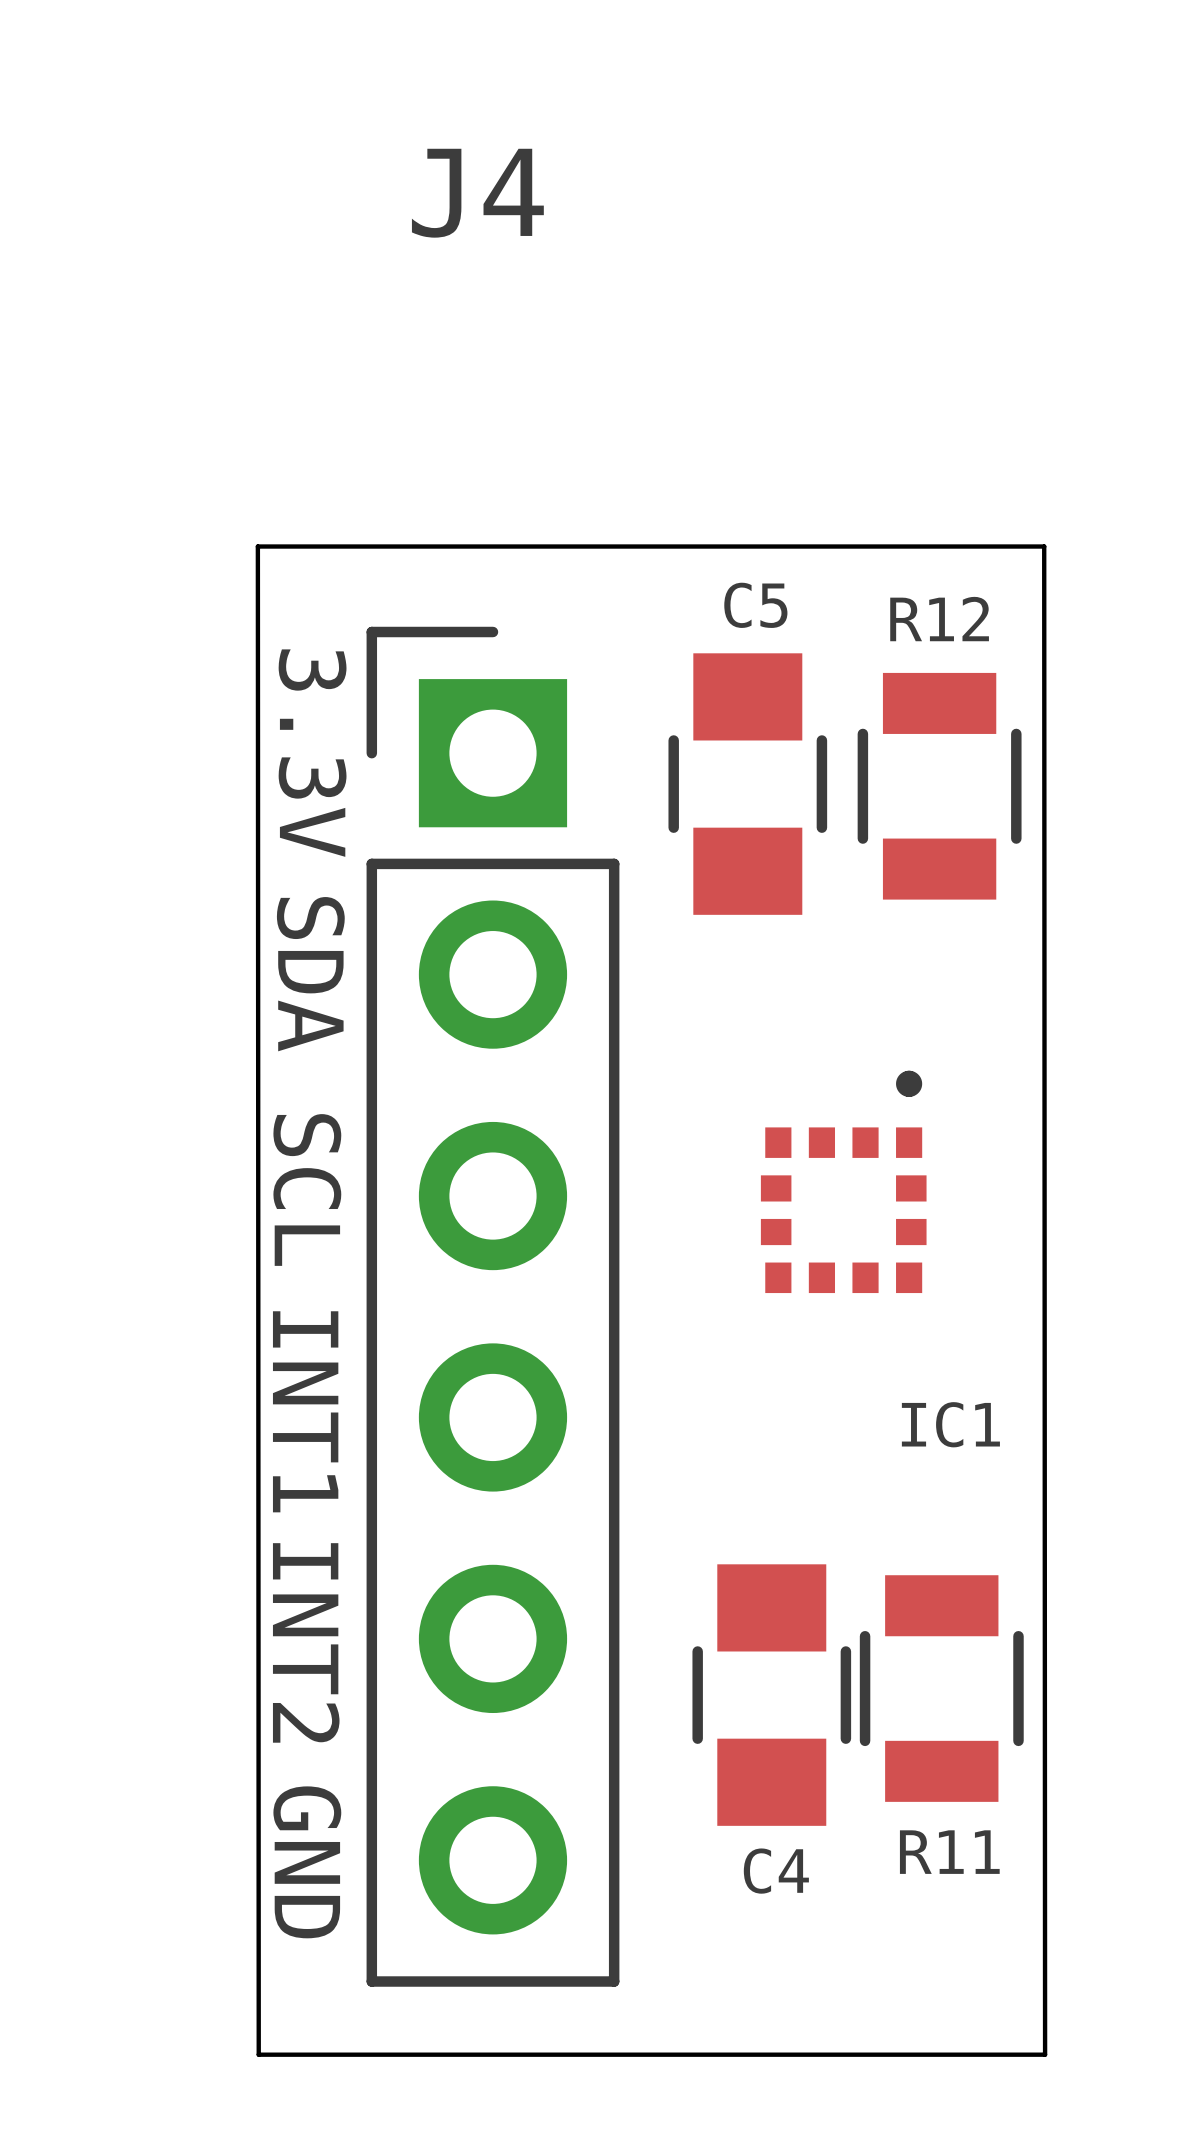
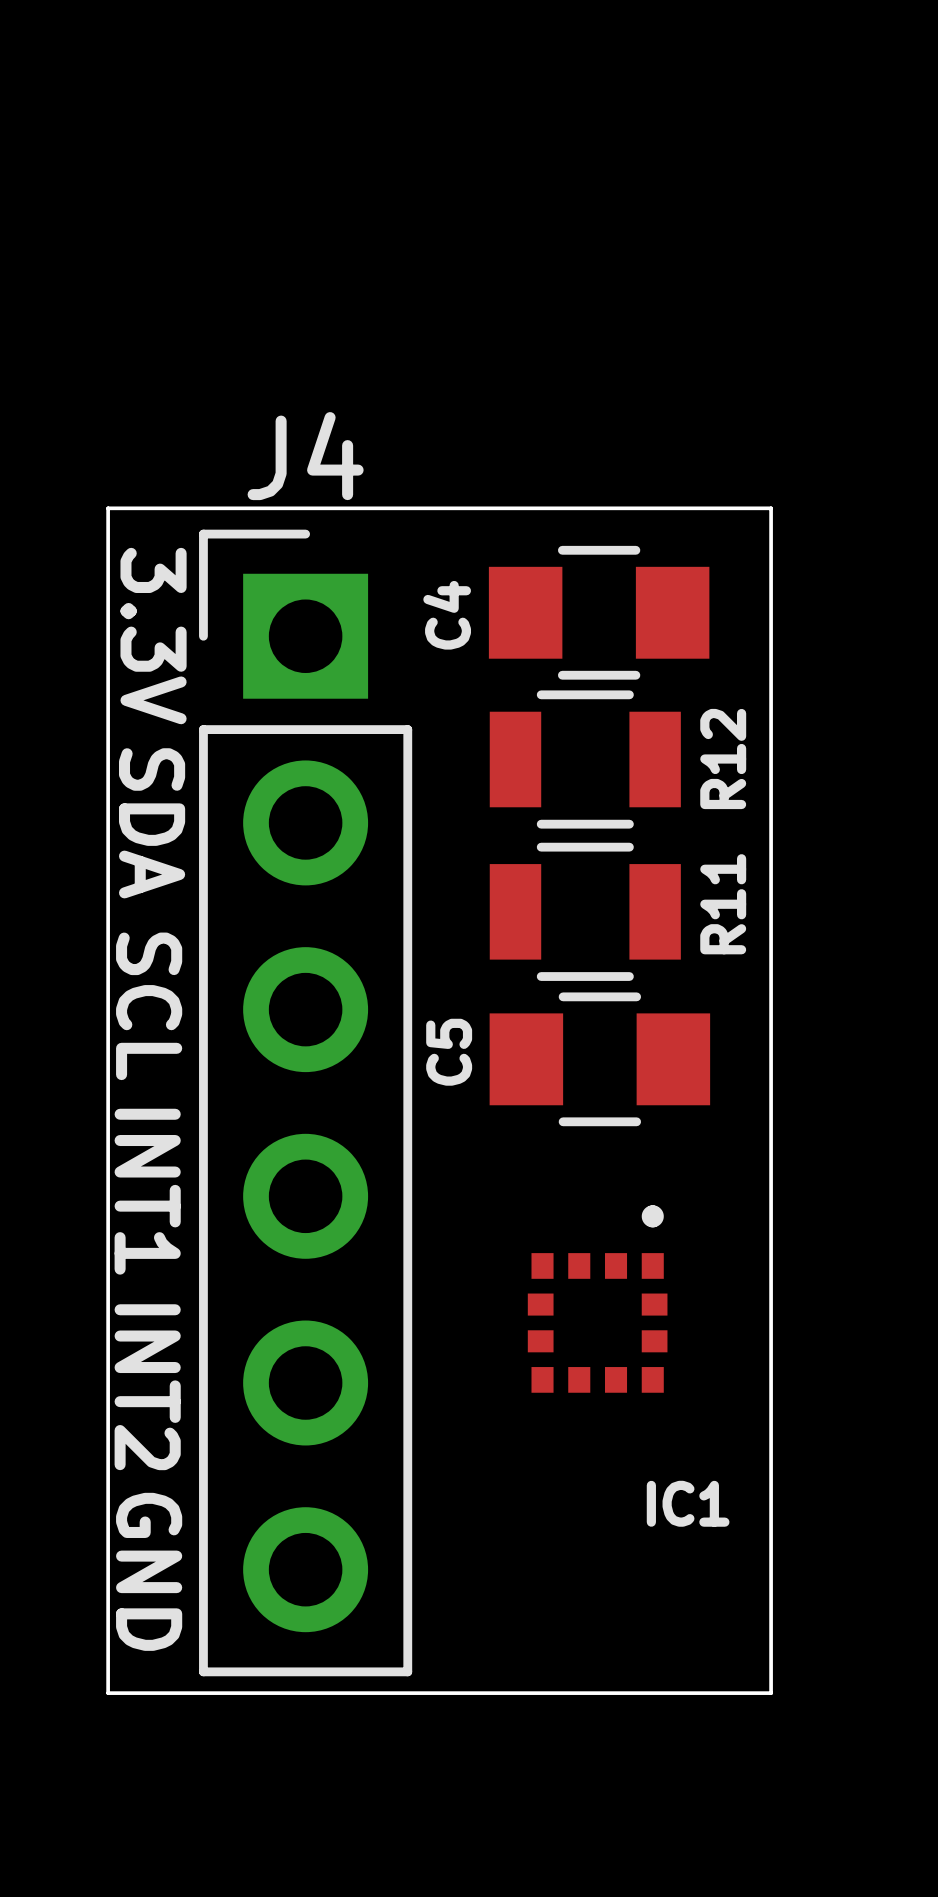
J4 name position: J4 (477, 193) -> J4 (305, 456)
board edge: (257, 546) (258, 2054) (1045, 2054) (1044, 546) (257, 546) -> (108, 508) (108, 1693) (771, 1693) (771, 508) (108, 508)
C5 name position: C5 (755, 605) -> C5 (449, 1052)
C5 rotation: 0° (747, 784) -> 90° clockwise (599, 1059)
C5 position: (747, 784) -> (599, 1059)
R12 rotation: 0° (939, 786) -> 90° clockwise (585, 759)
R12 position: (939, 786) -> (585, 759)
IC1 position: (843, 1181) -> (597, 1299)
R11 rotation: 0° (941, 1688) -> 90° clockwise (585, 911)
R11 position: (941, 1688) -> (585, 911)
C4 rotation: 0° (771, 1695) -> 90° clockwise (599, 612)
C4 position: (771, 1695) -> (599, 612)
R11 name position: R11 (949, 1852) -> R11 (723, 904)

